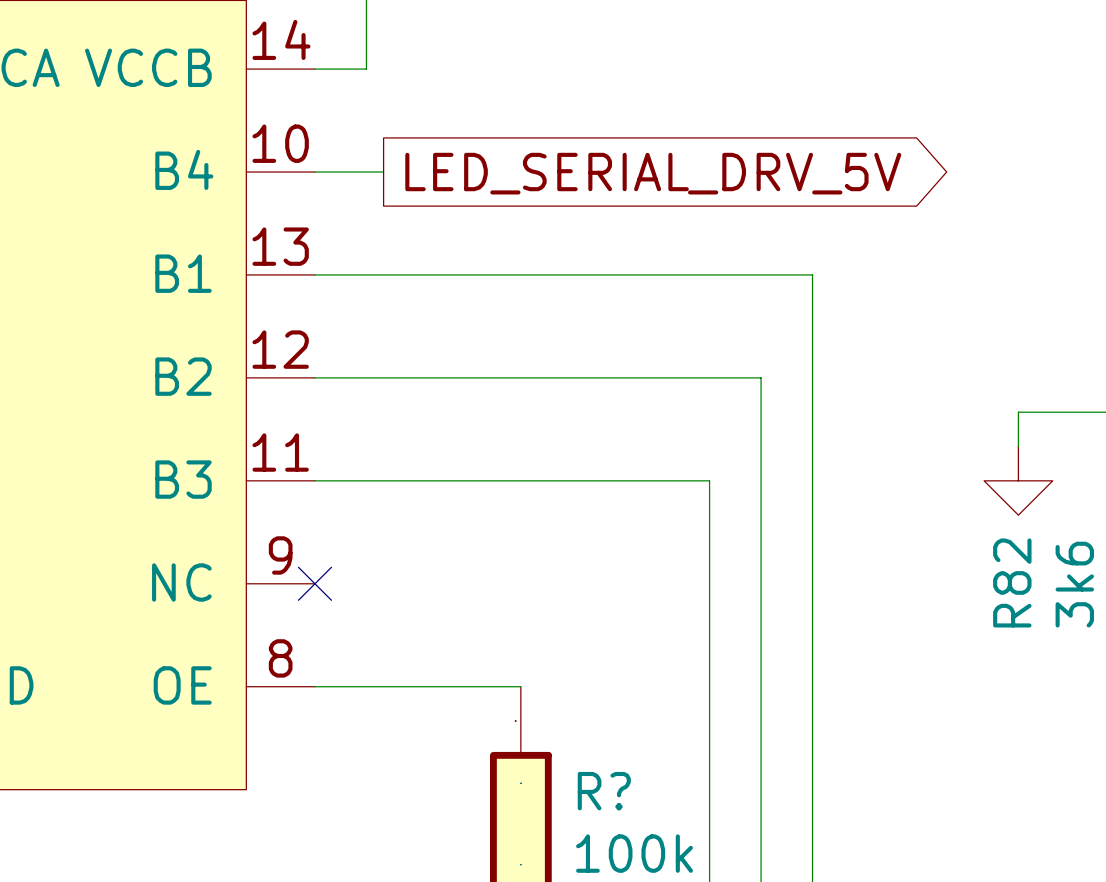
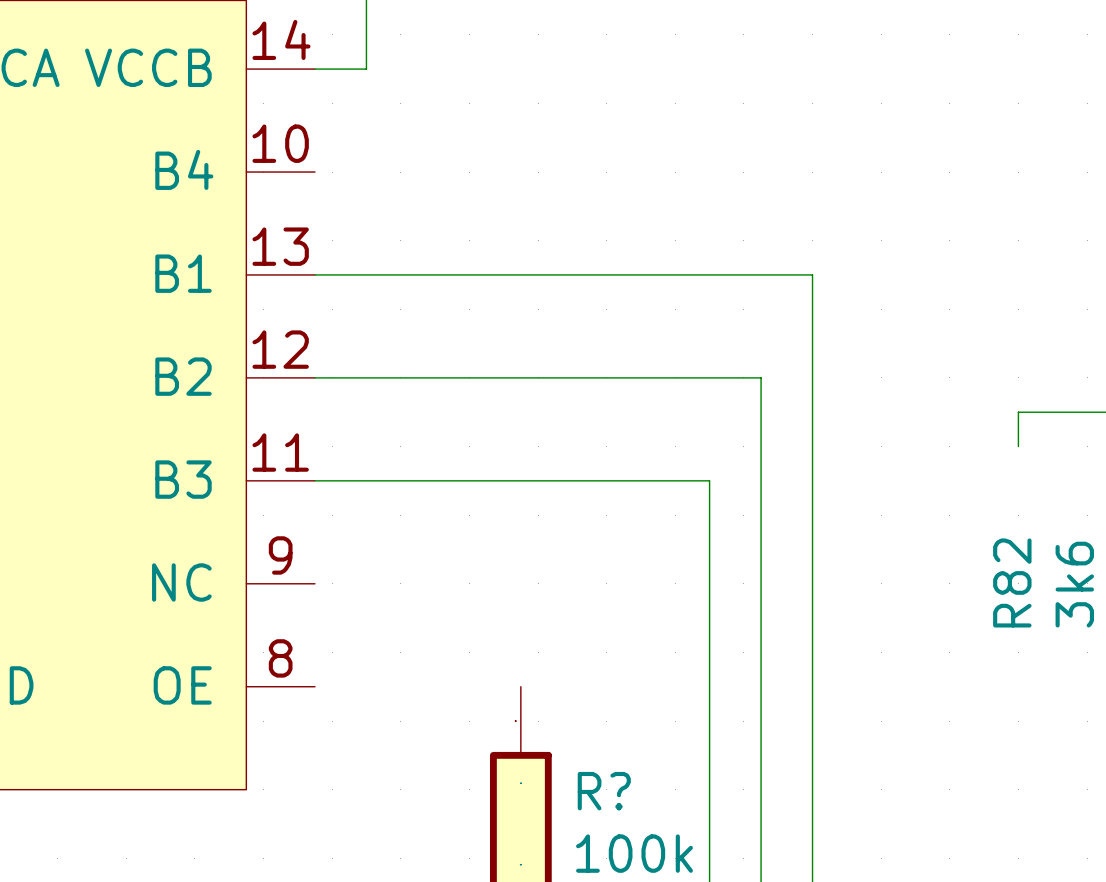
wire: (314, 172) (383, 172) -> none
global label: LED_SERIAL_DRV_5V (653, 173) -> none
power symbol: (1018, 480) -> none
no-connect mark: (314, 583) -> none
wire: (314, 686) (520, 686) -> none

